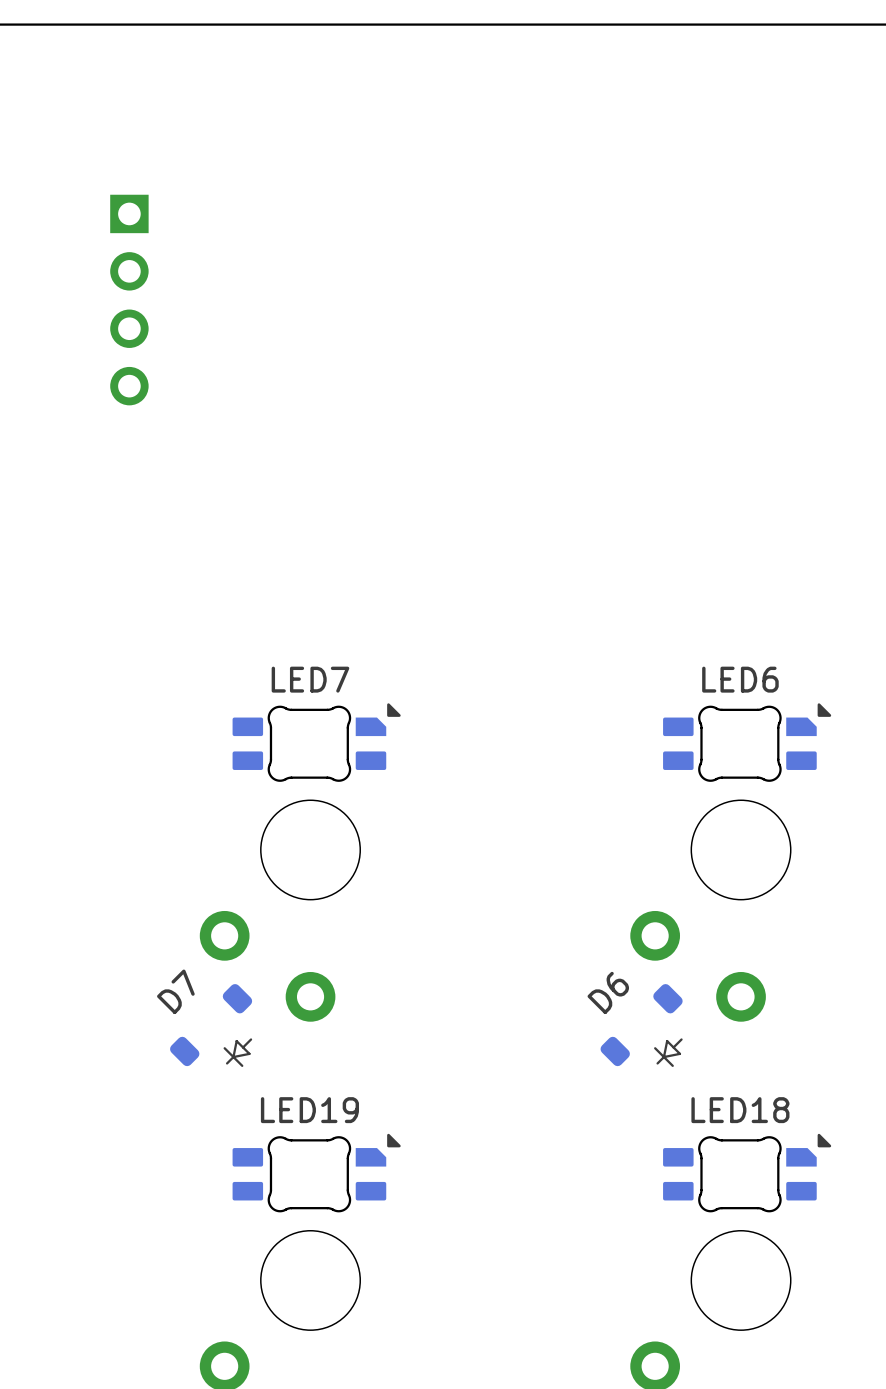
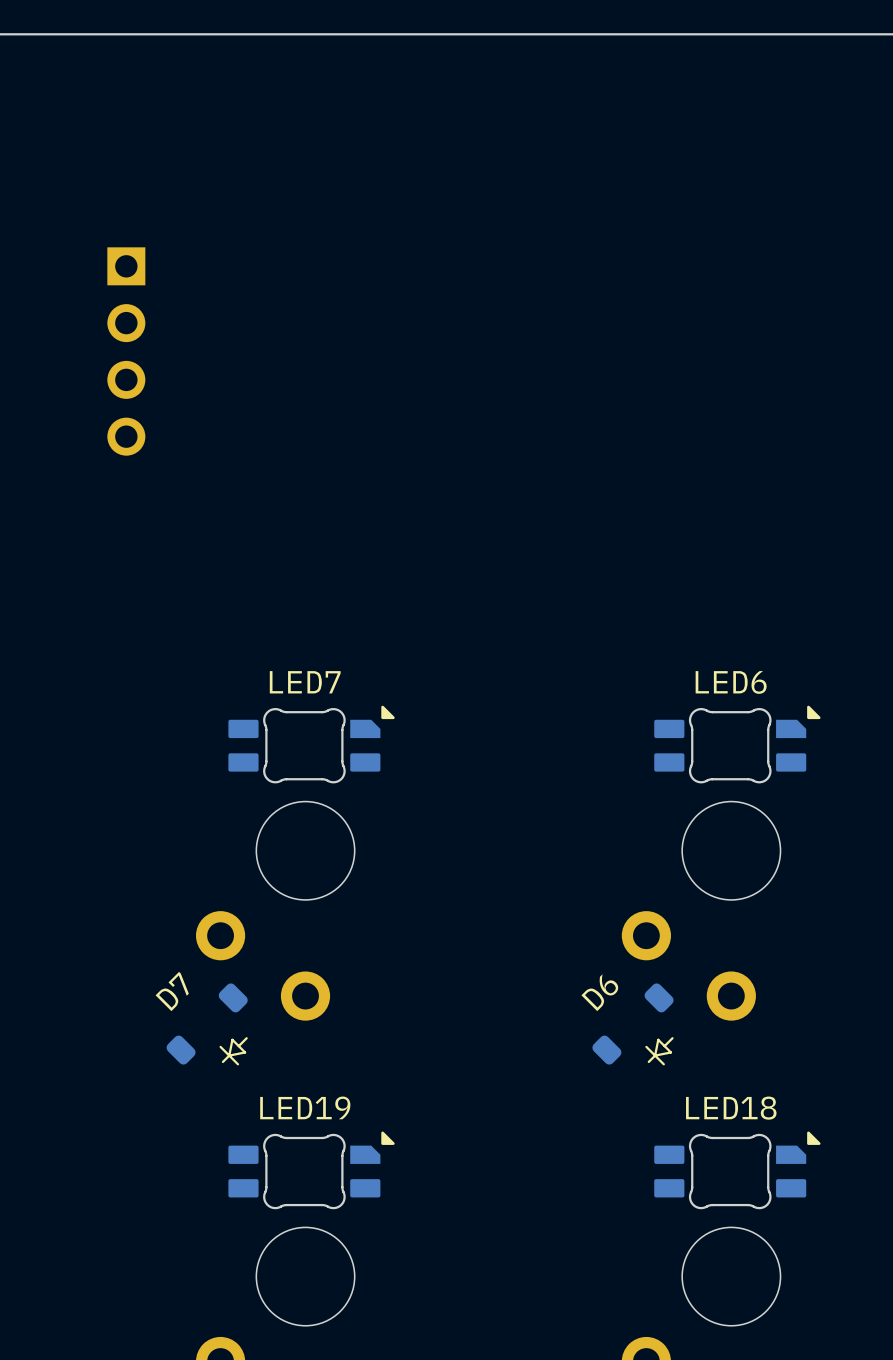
part position: (129, 300) -> (126, 351)

